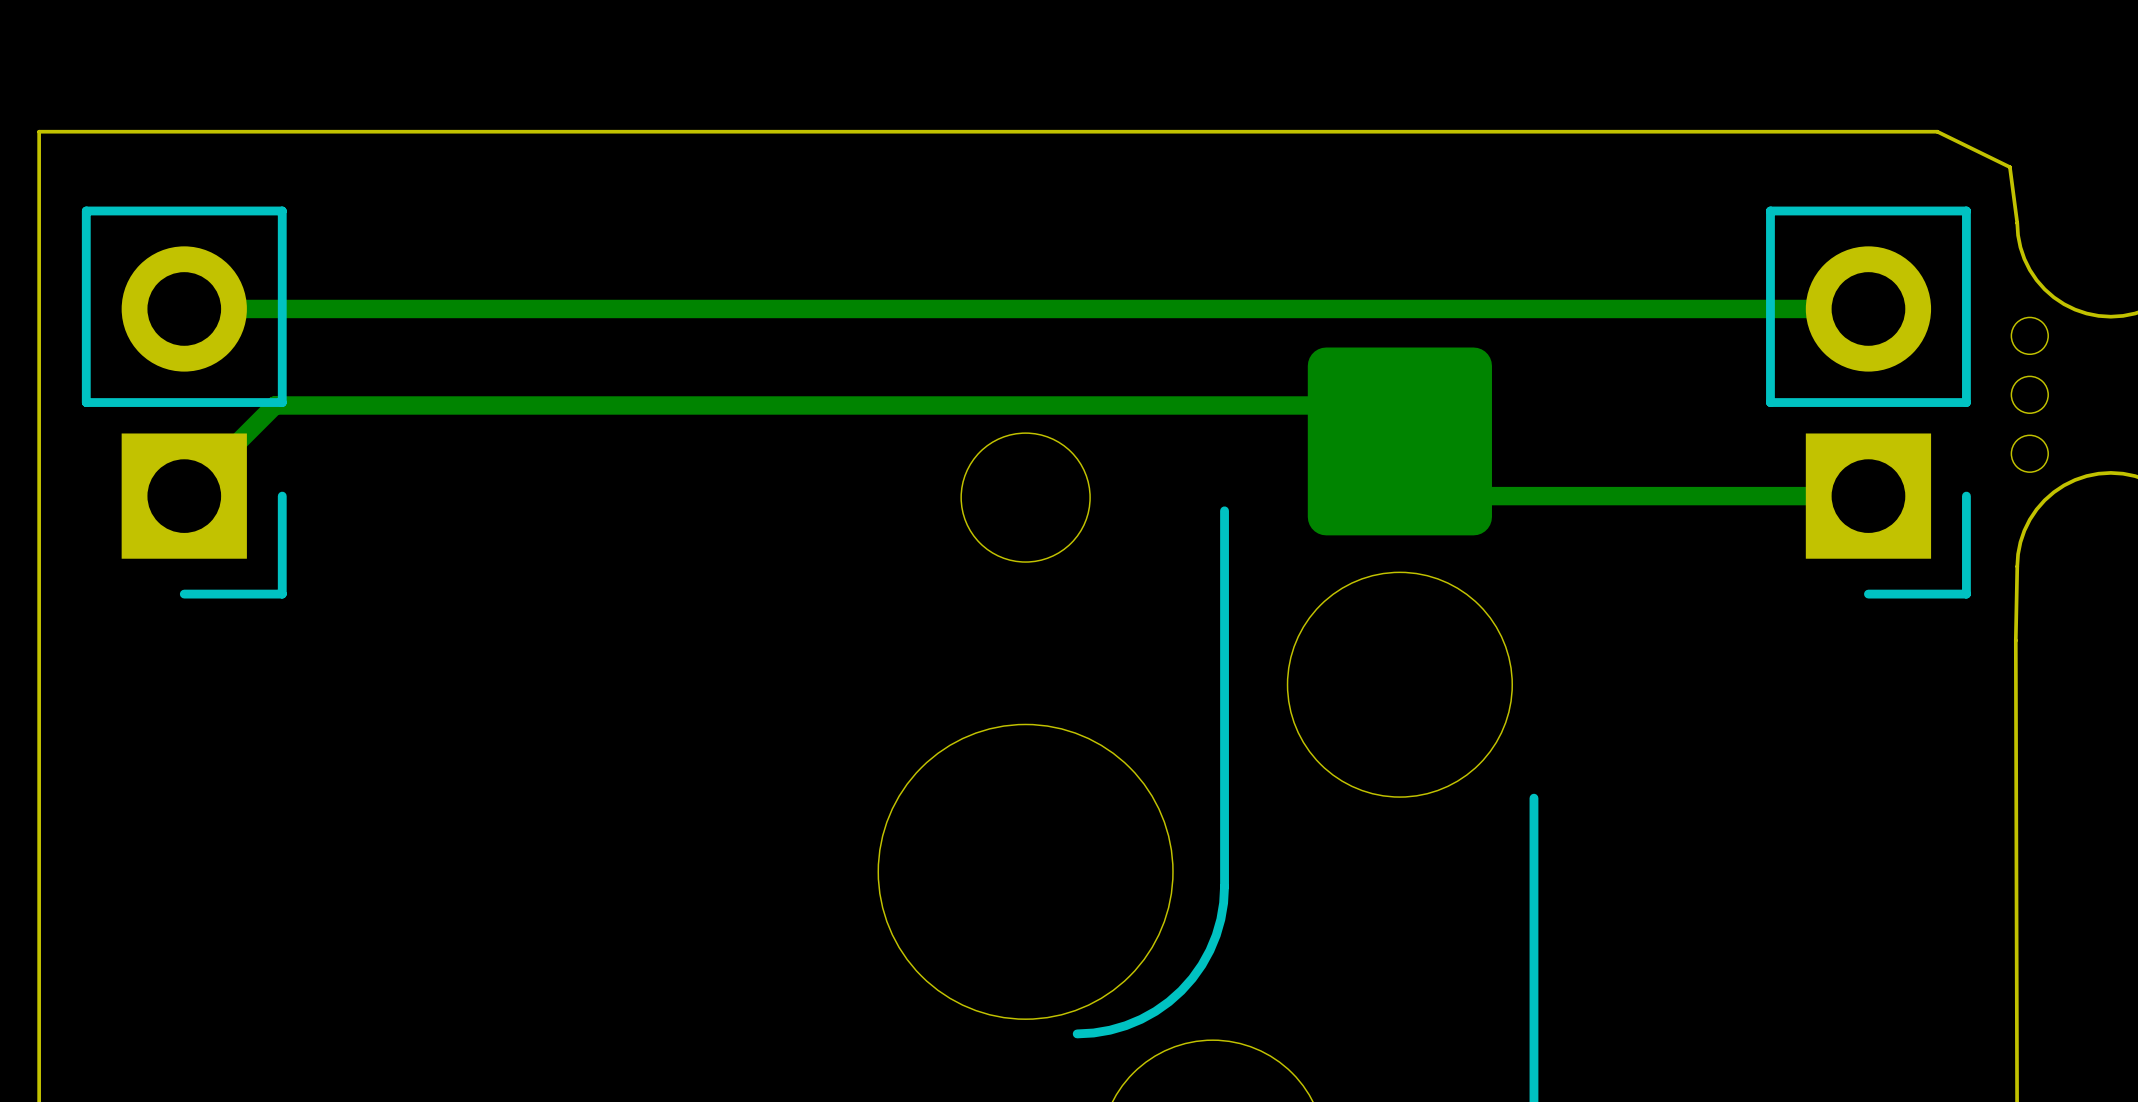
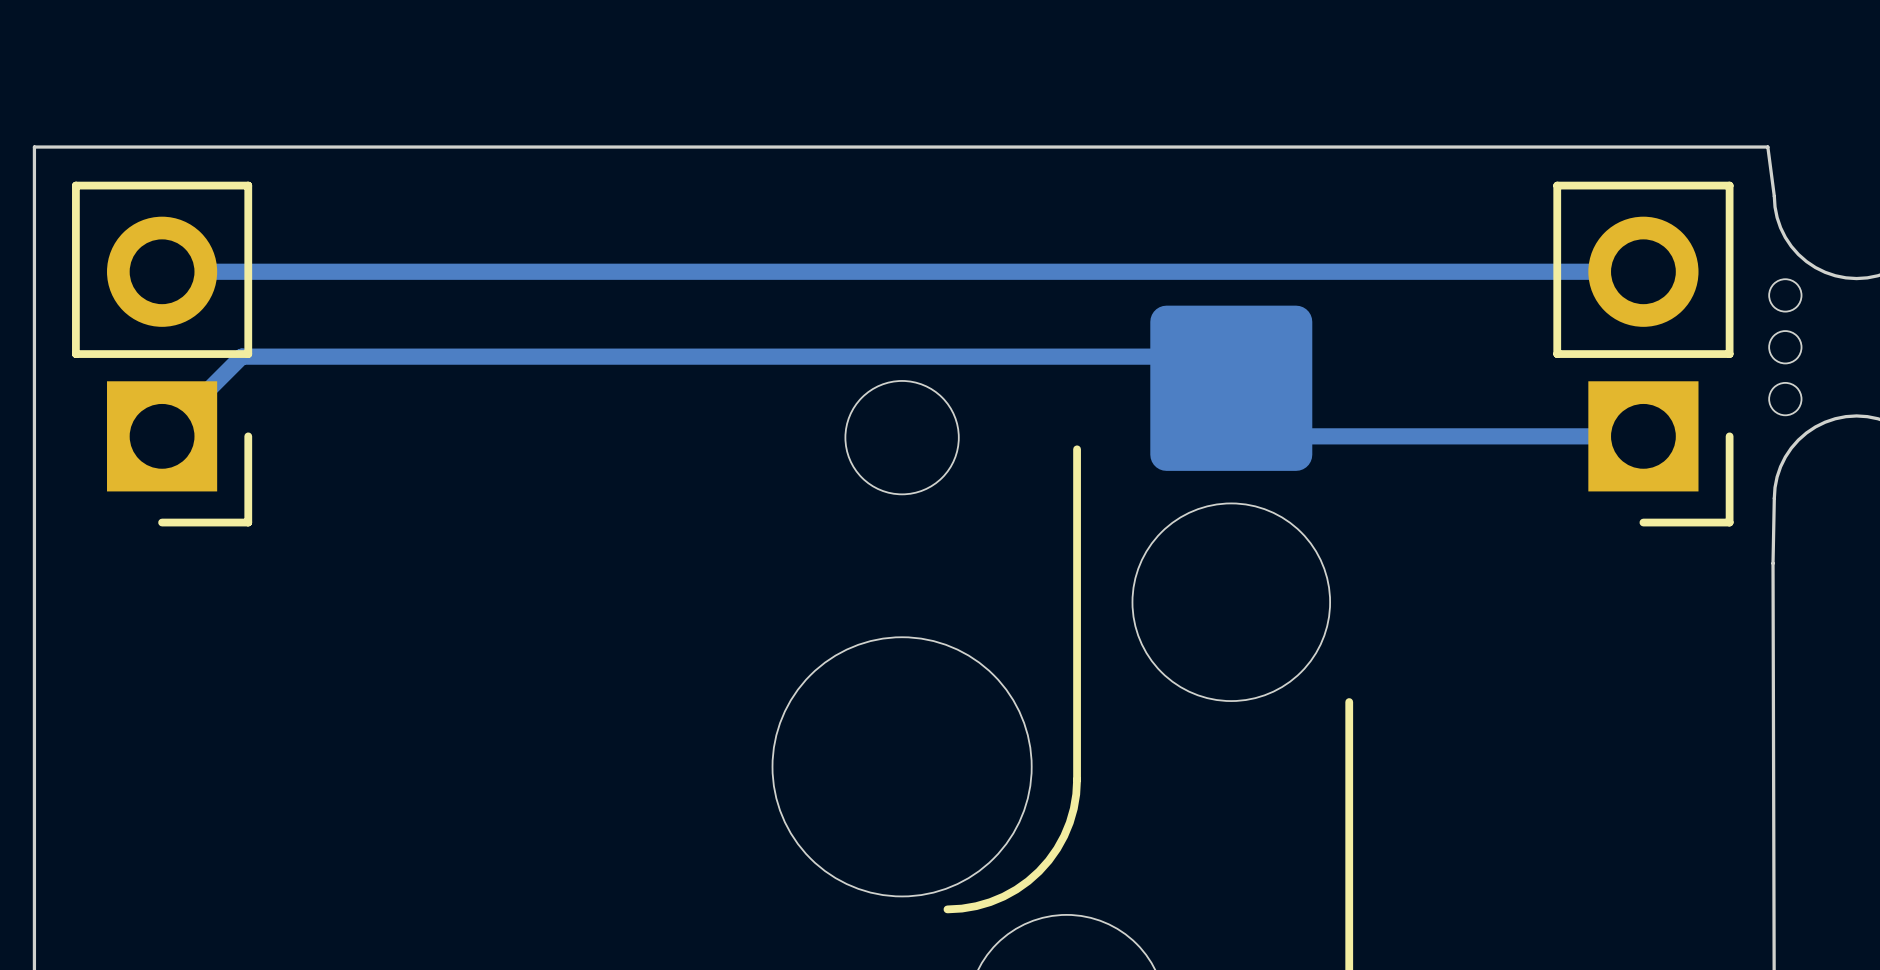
board edge: (2009, 167) (1937, 131) (39, 131) (39, 167) -> (1767, 147) (34, 147)

